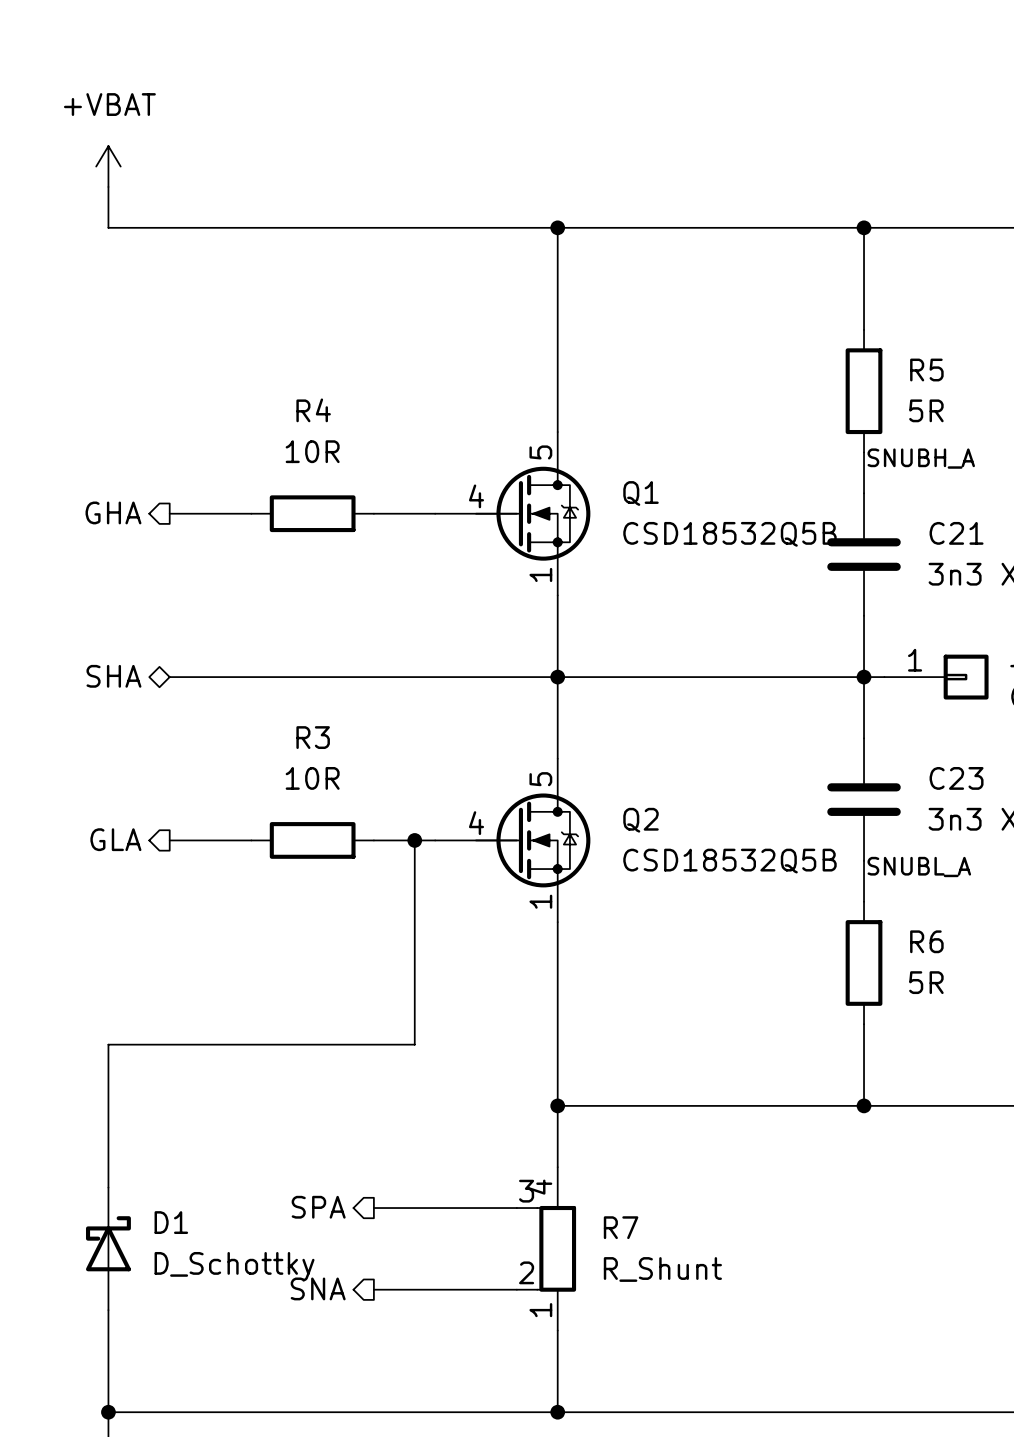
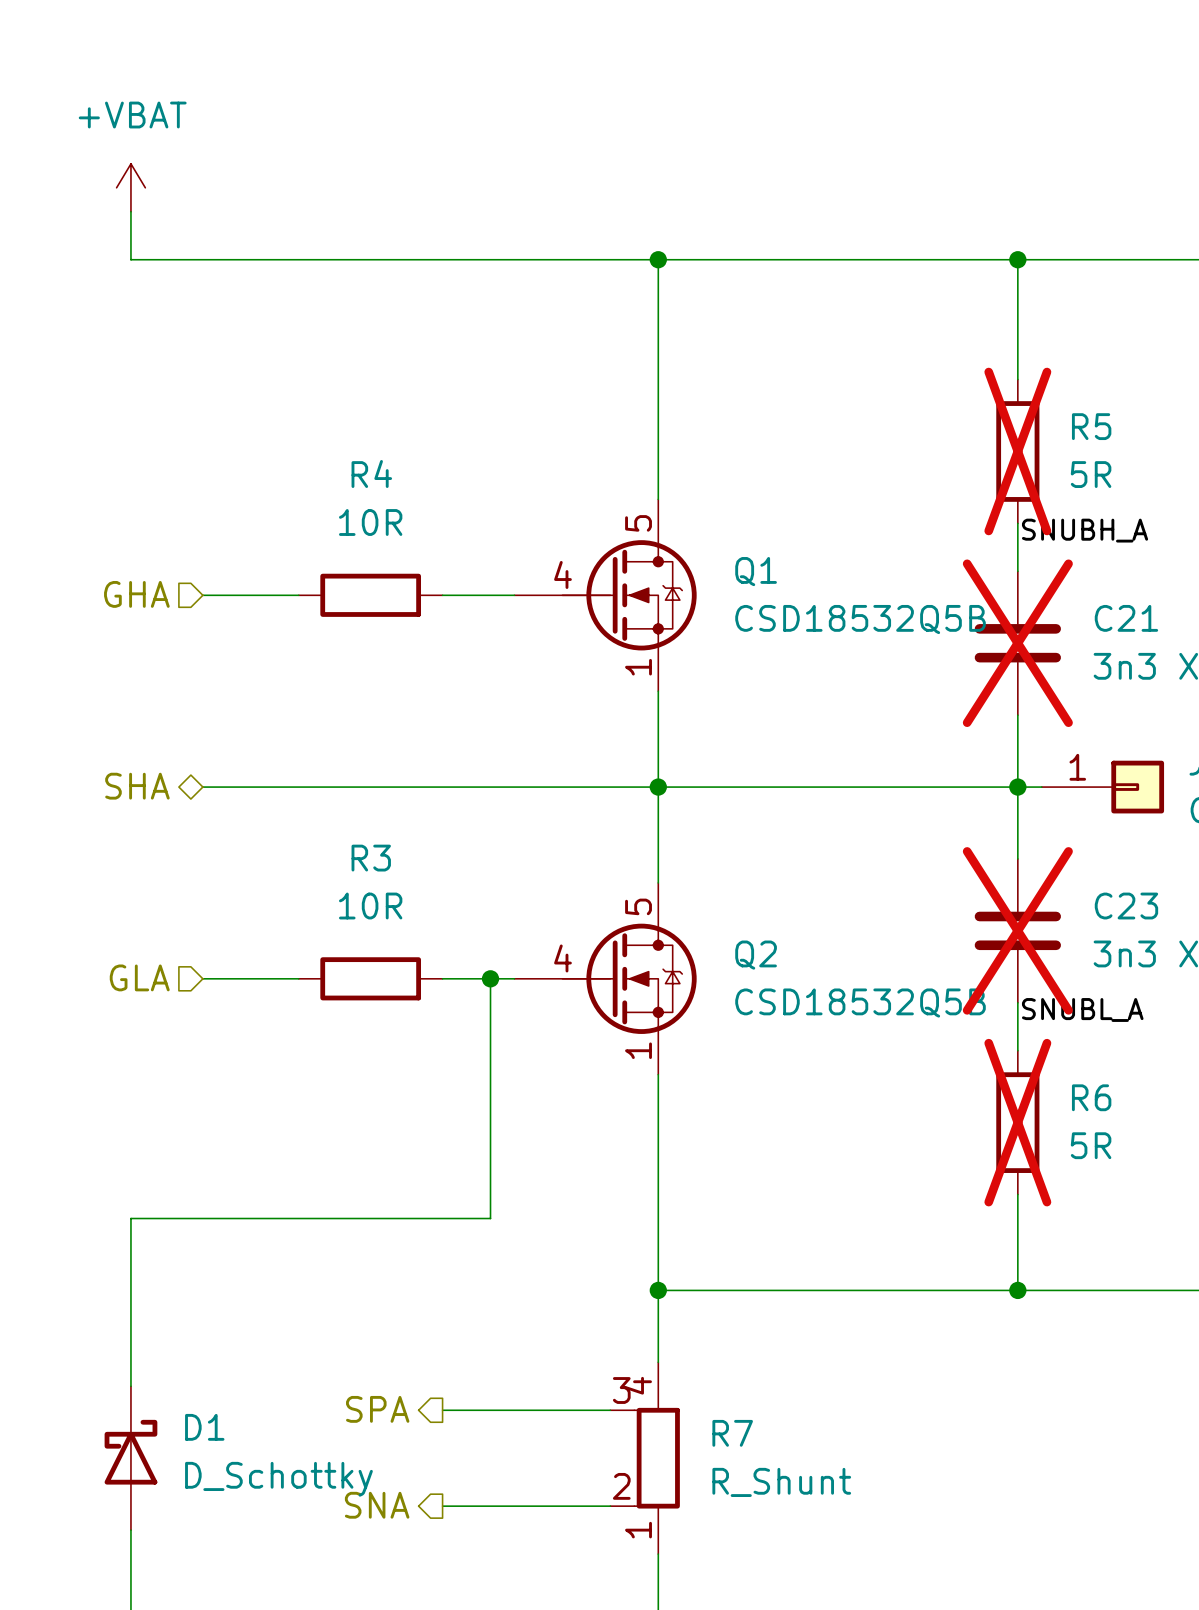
R5 do-not-place cross: none -> (1017, 451)
hierarchical label shape: output (113, 512) -> input (136, 594)
C21 do-not-place cross: none -> (1017, 643)
C23 do-not-place cross: none -> (1017, 930)
hierarchical label shape: output (115, 839) -> input (139, 977)
R6 do-not-place cross: none -> (1017, 1122)

